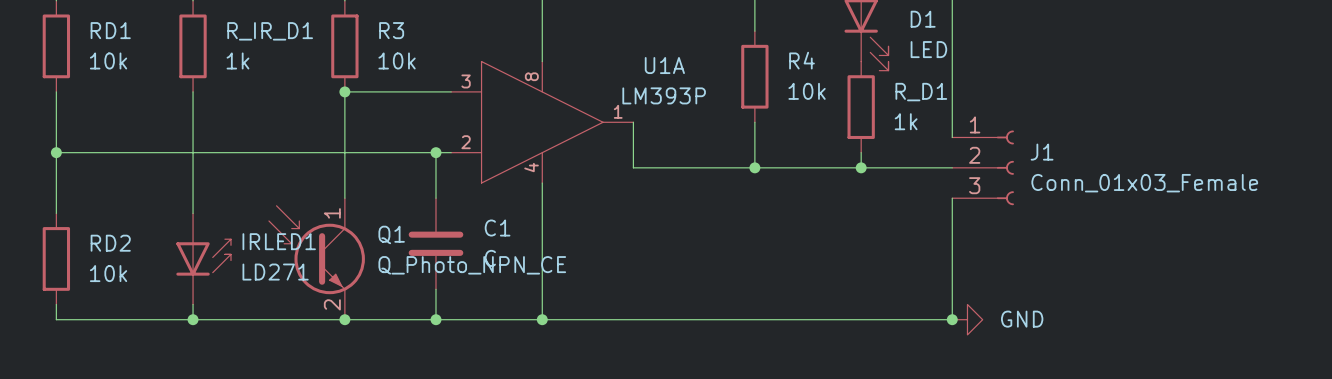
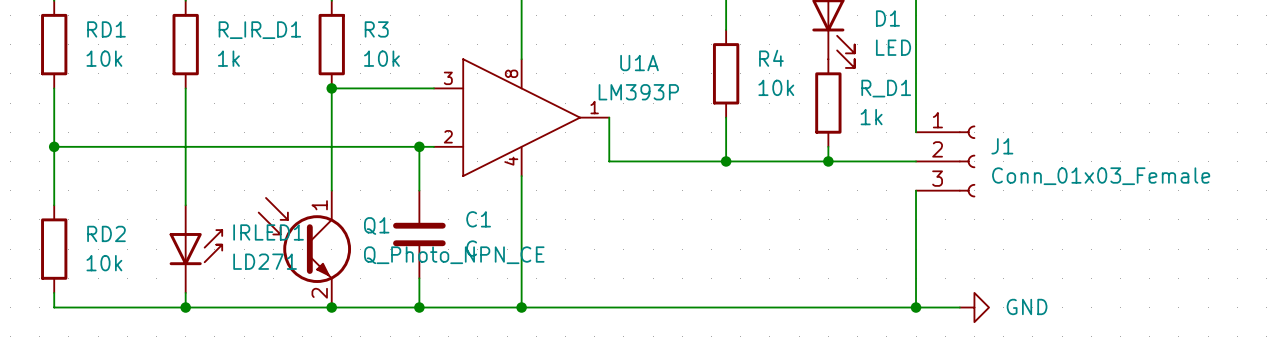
wire: none -> (916, 307) (959, 307)
power symbol position: GND (967, 319) -> GND (974, 307)

